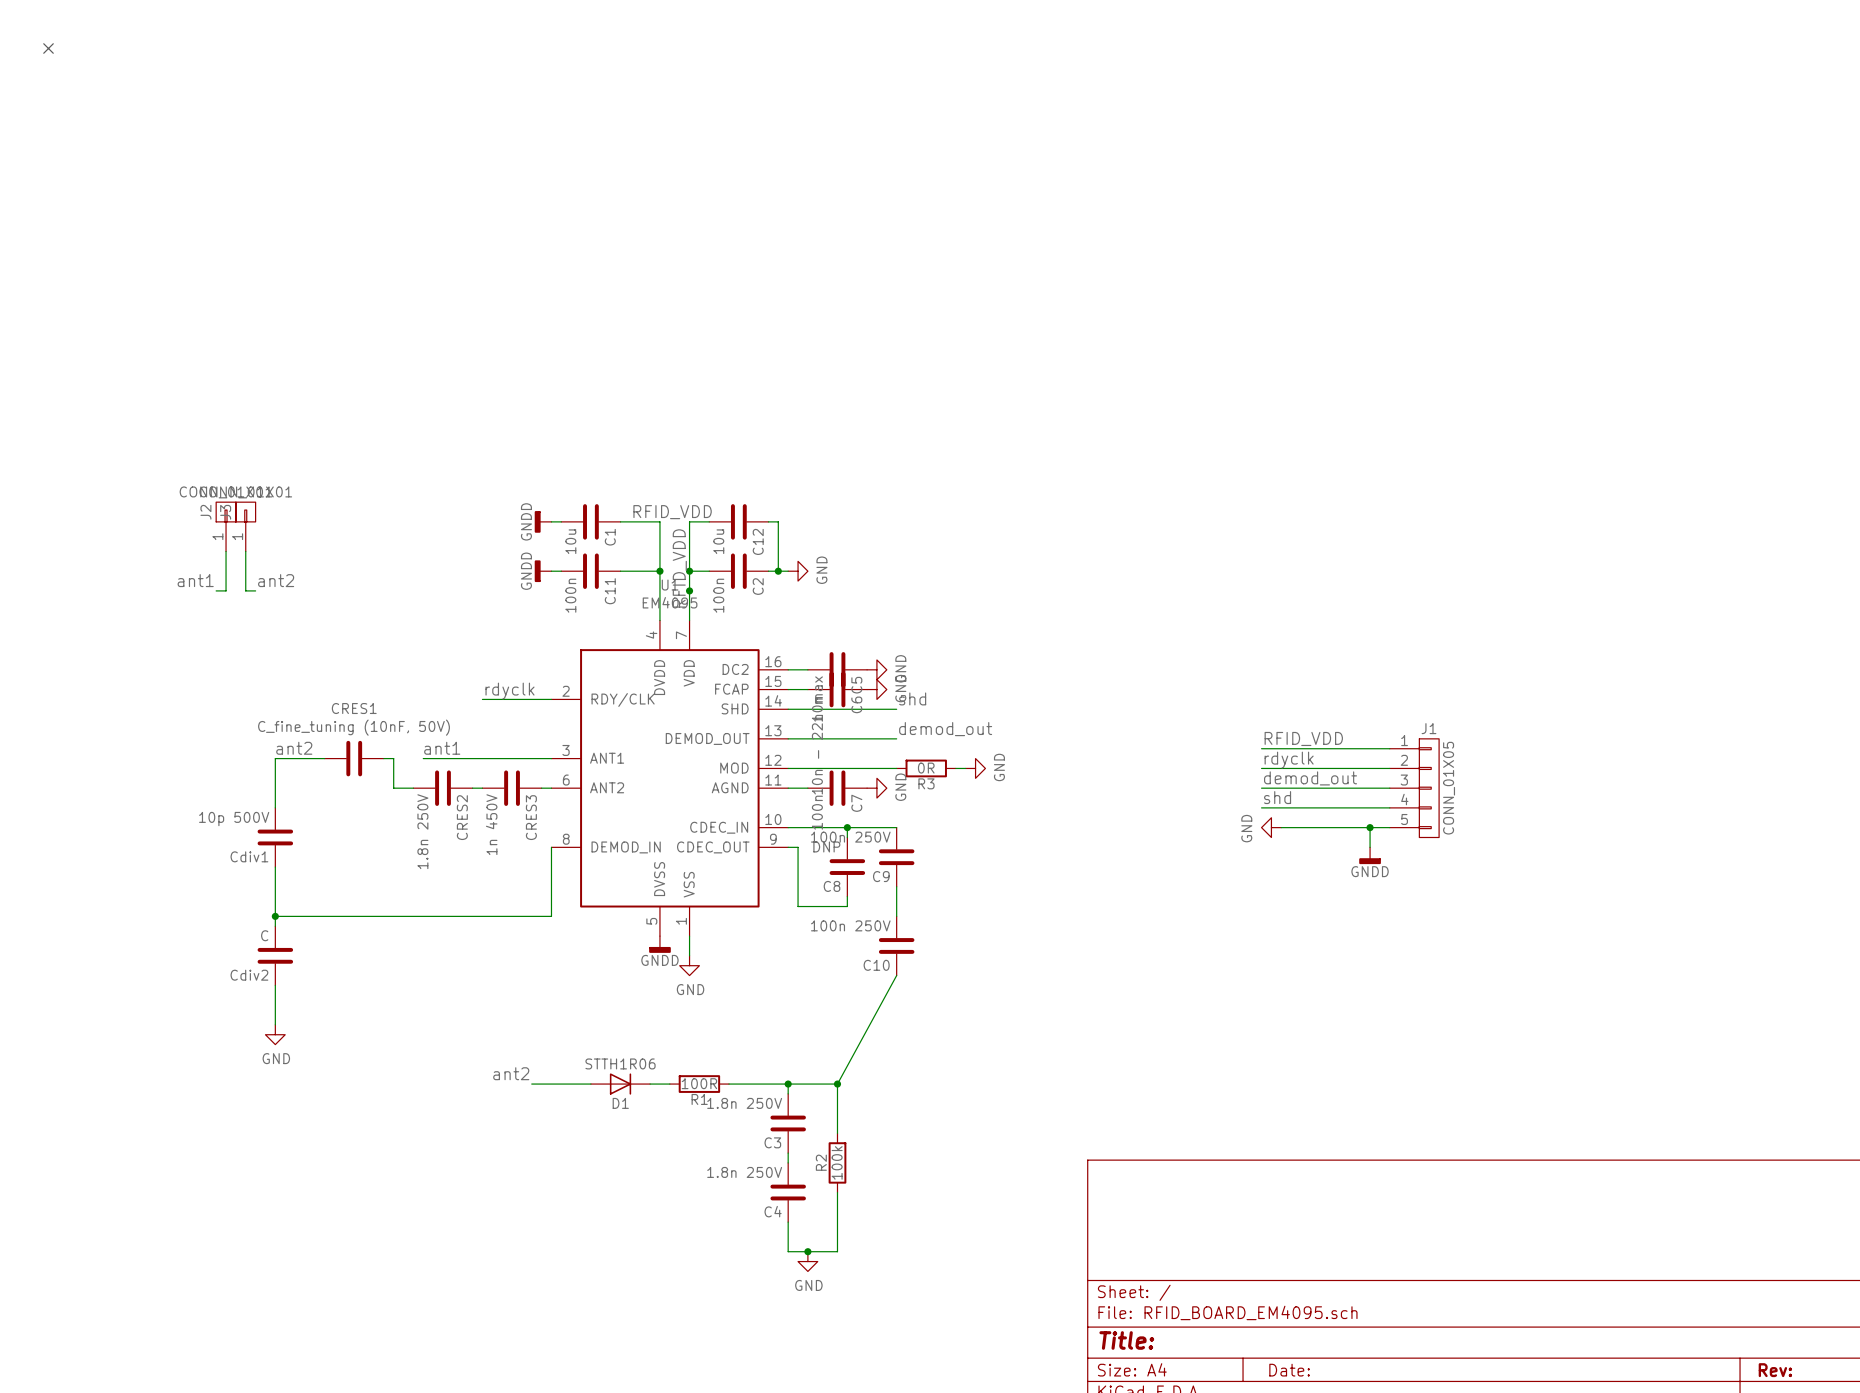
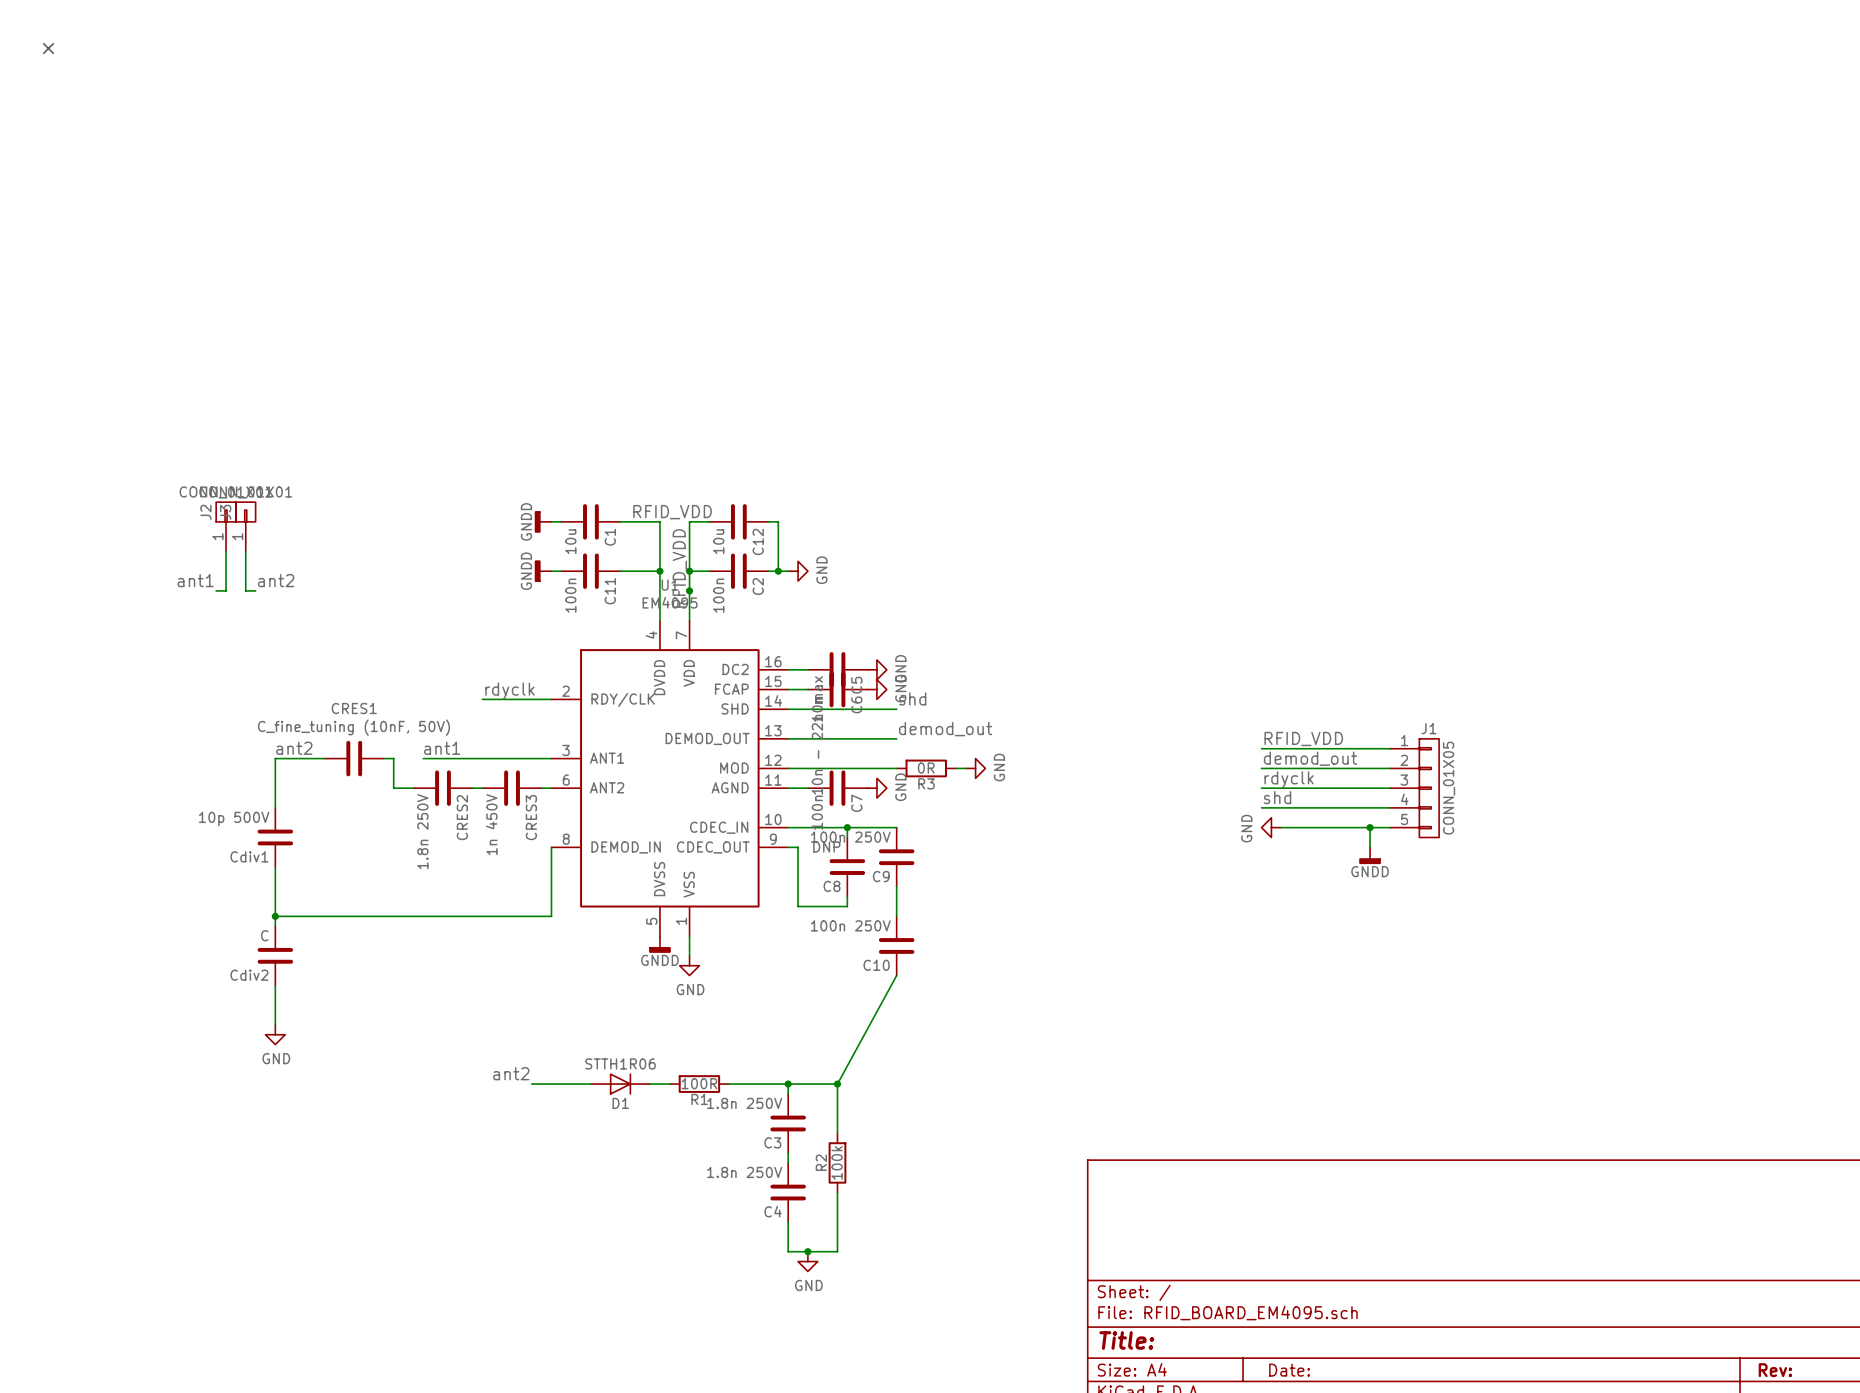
label: rdyclk (1289, 760) -> demod_out (1310, 758)
label: demod_out (1310, 778) -> rdyclk (1289, 779)

